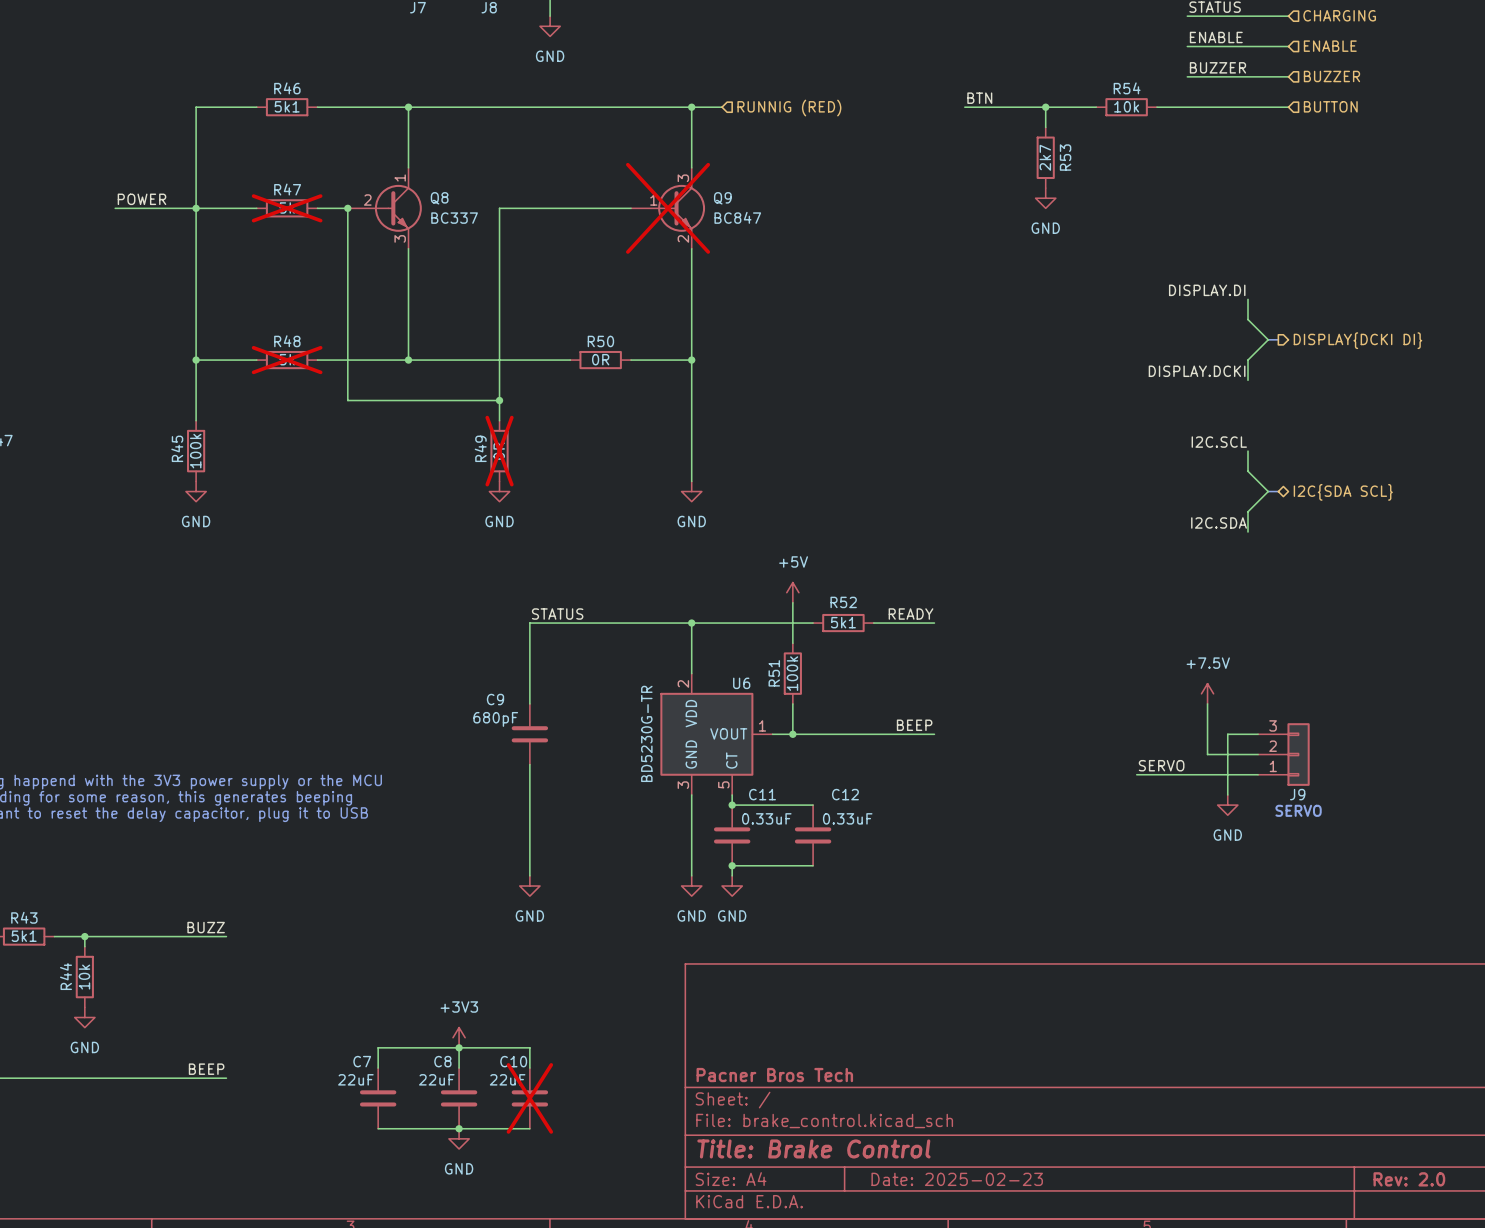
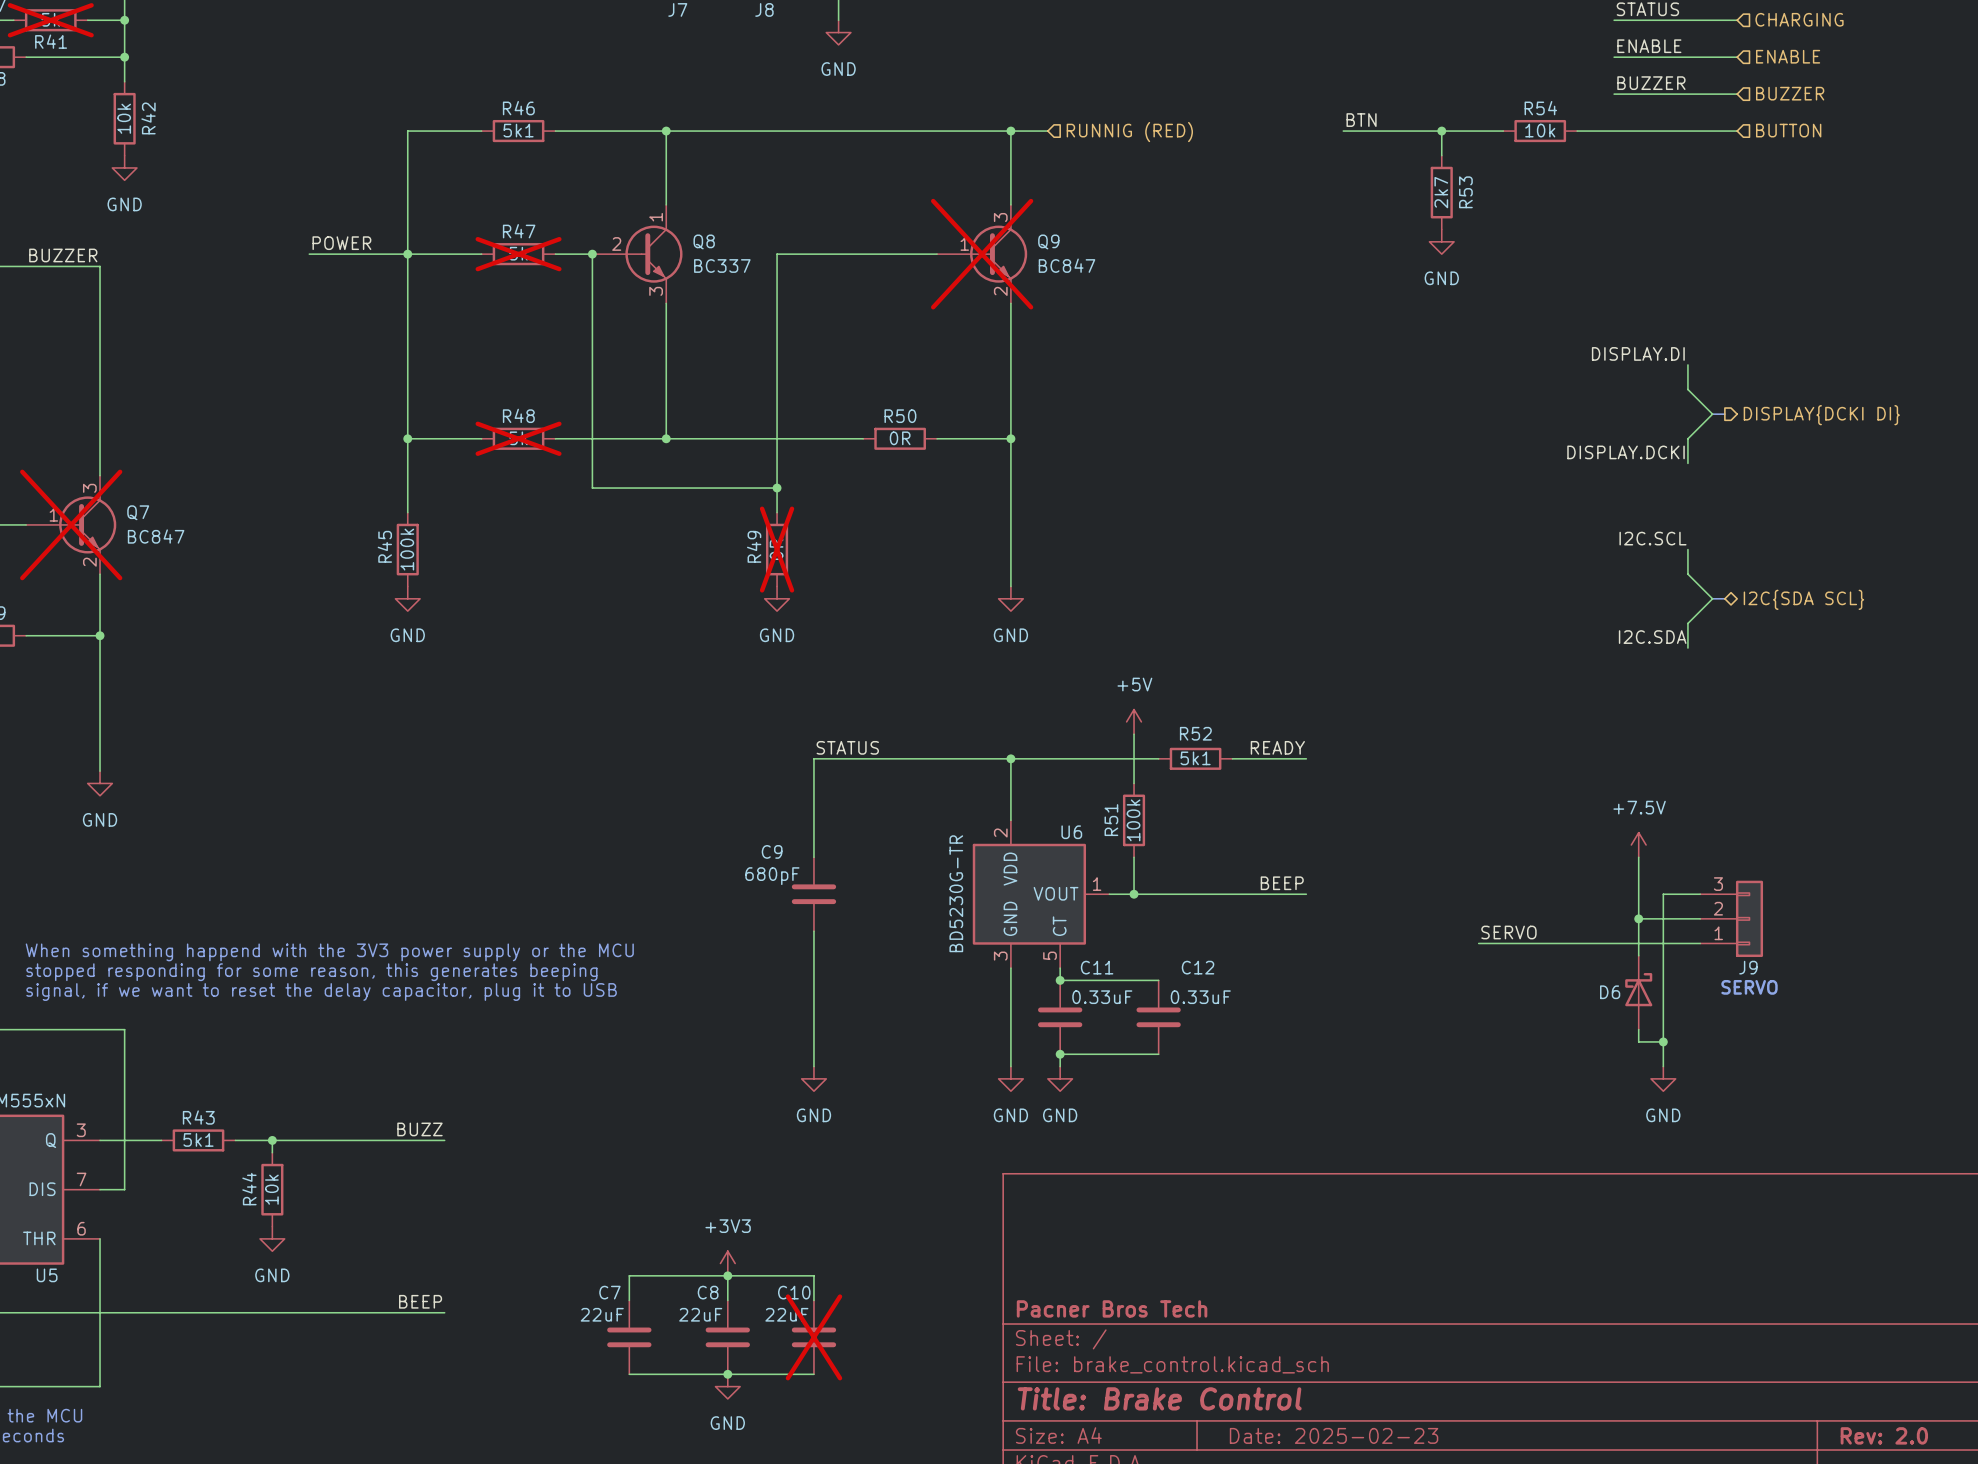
wire: none -> (1638, 918) (1638, 955)
junction: none -> (1638, 918)
label position: SERVO (1161, 765) -> SERVO (1508, 932)
wire: none -> (1478, 943) (1552, 943)
wire: none -> (1663, 968) (1663, 1066)
power symbol position: GND (1227, 805) -> GND (1663, 1078)
D6: none -> (1638, 992)
wire: none -> (1638, 1029) (1638, 1041) (1663, 1041)
junction: none -> (1663, 1041)

